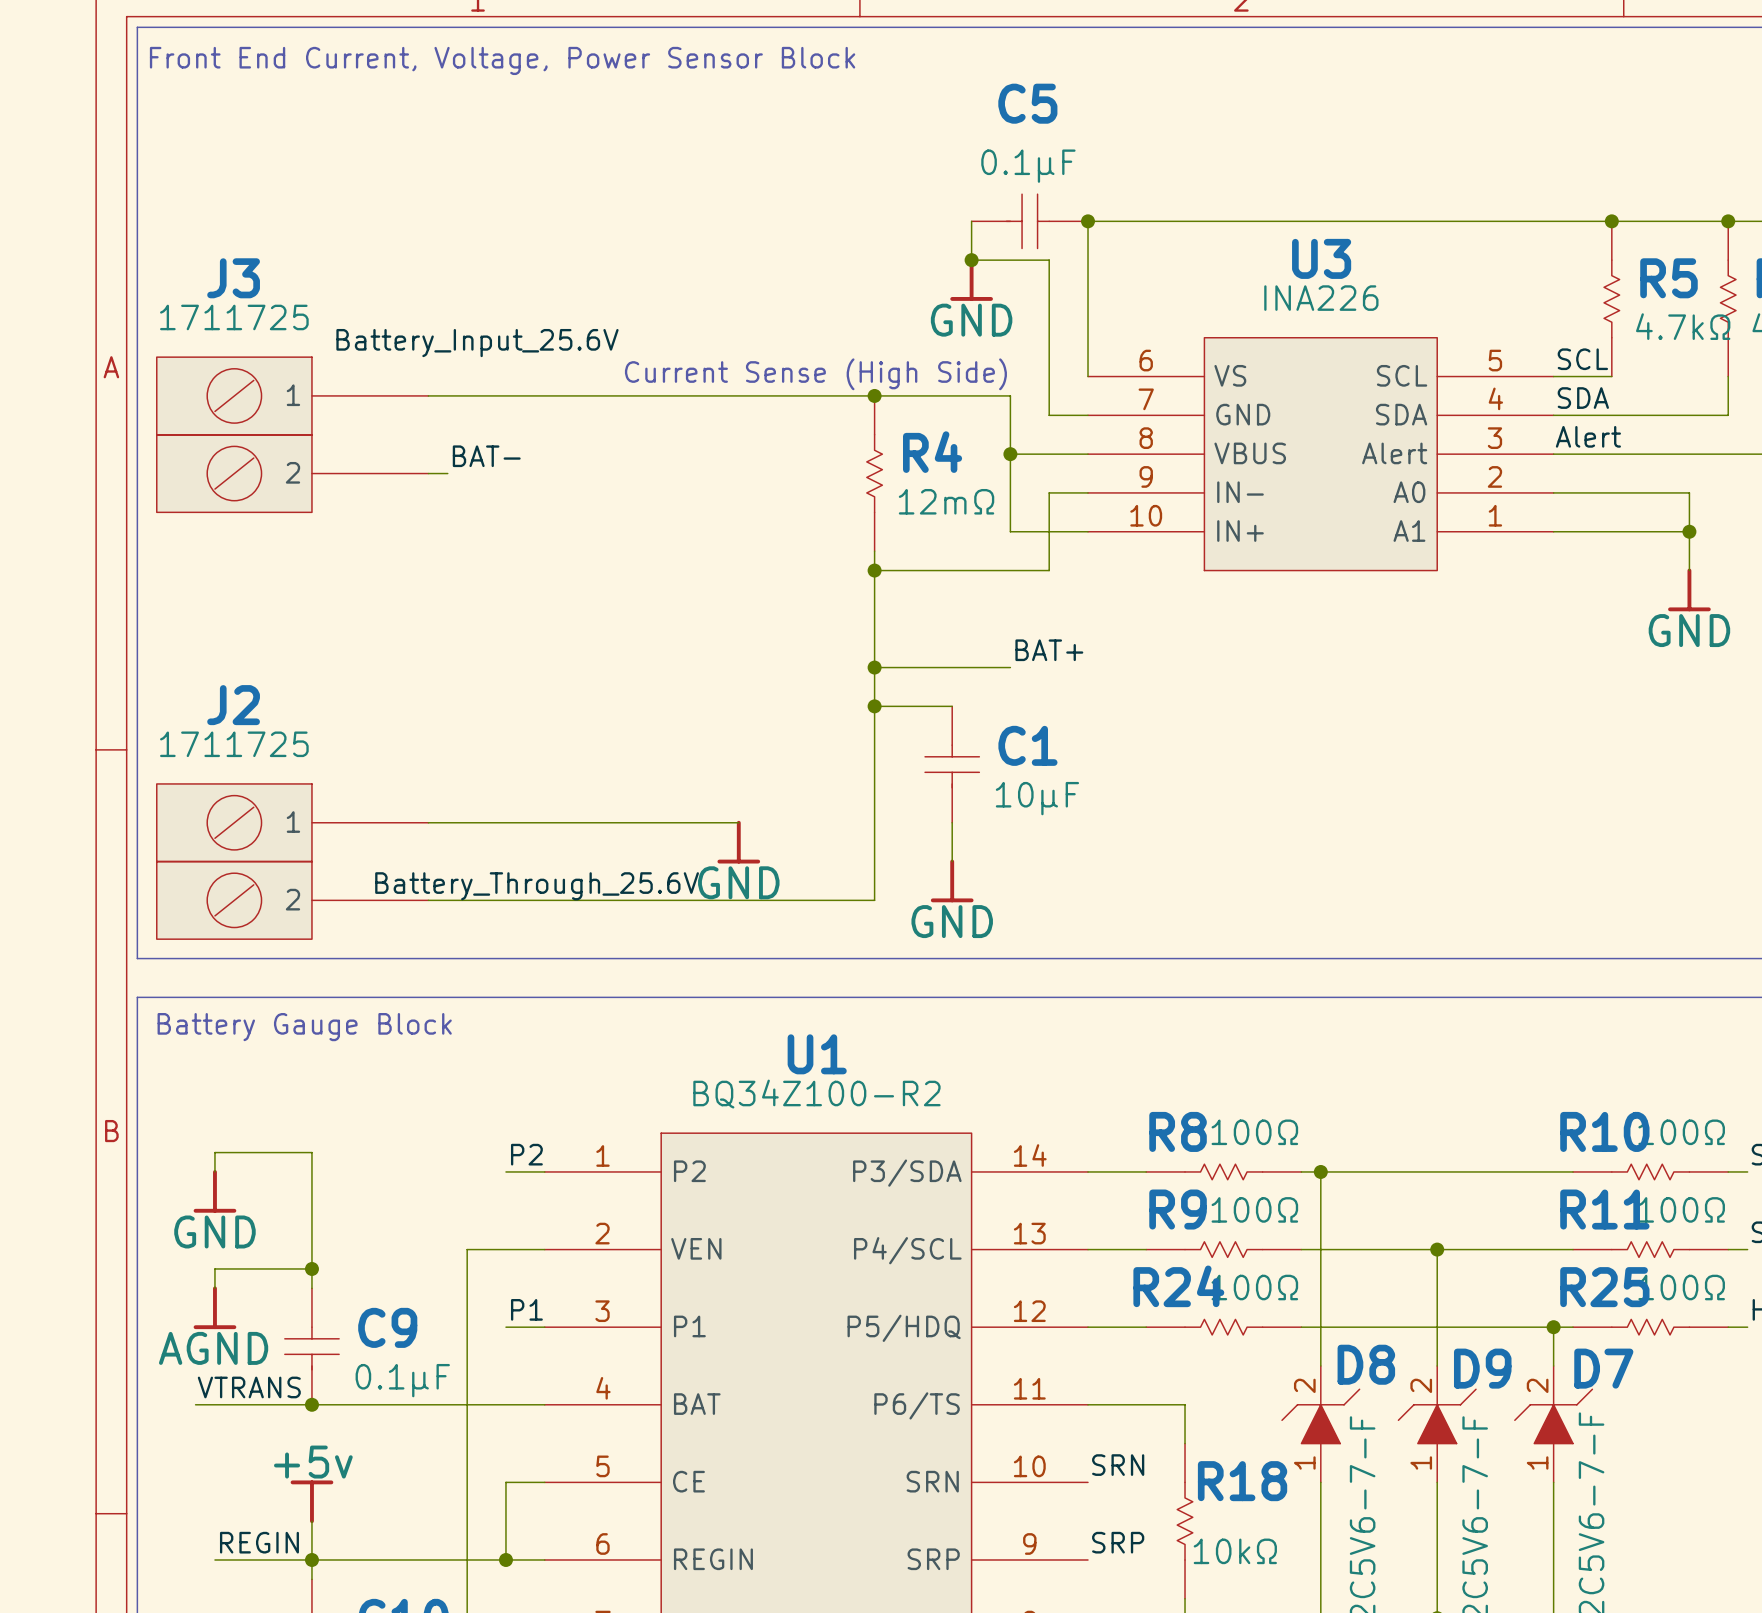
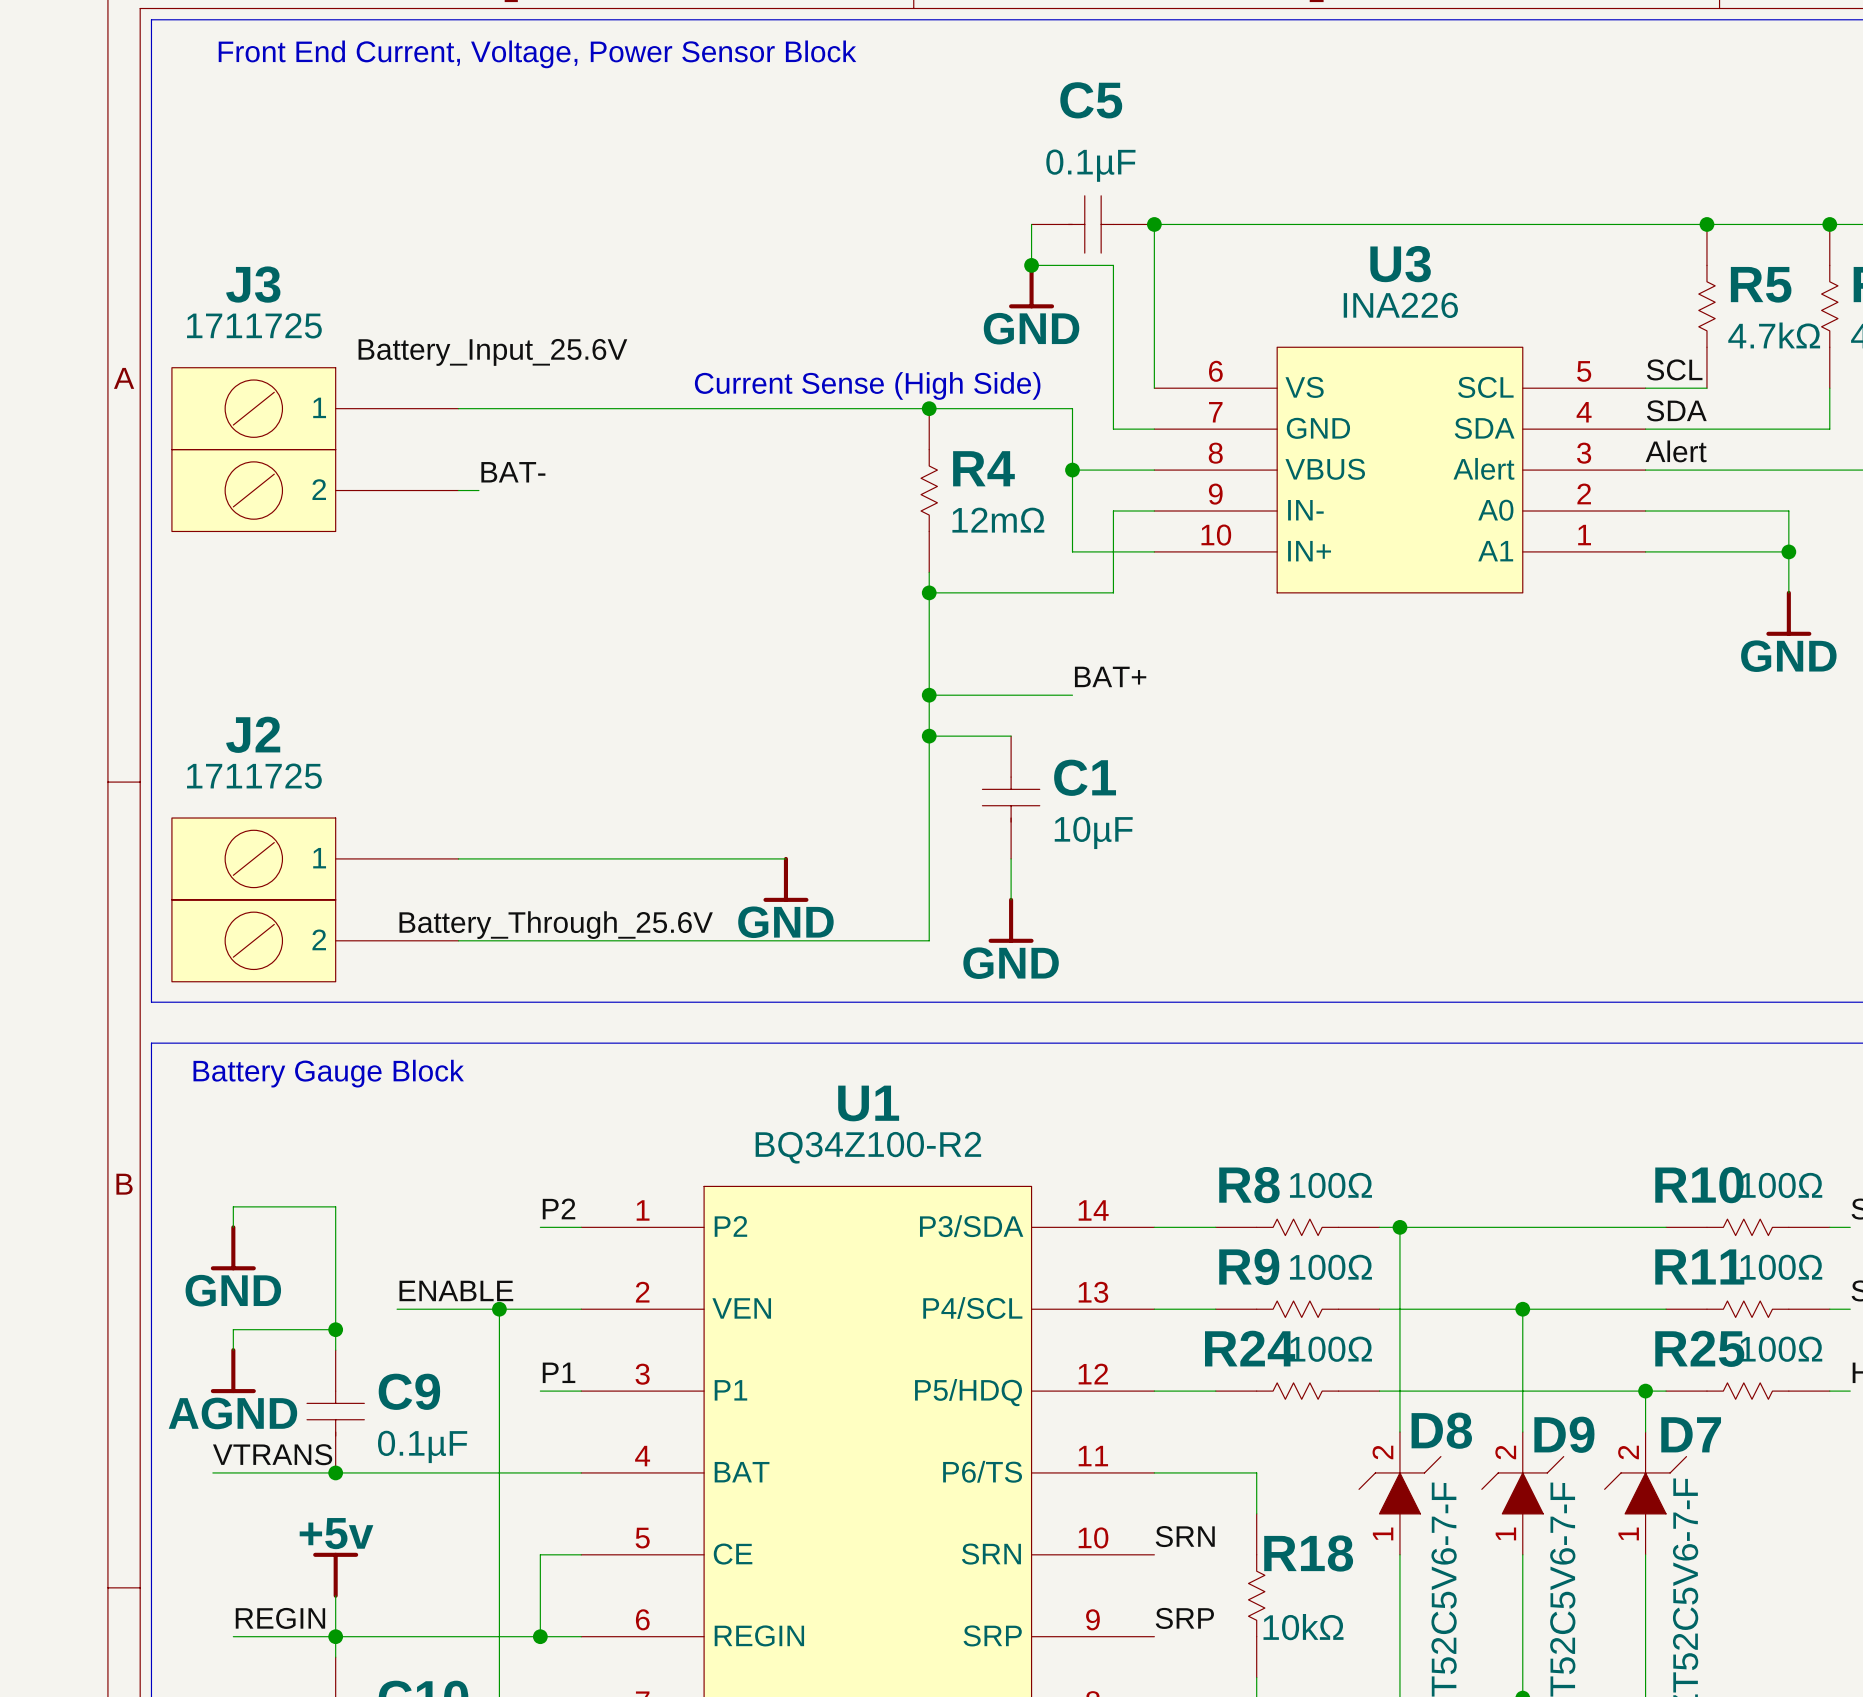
label: none -> ENABLE (456, 1290)
wire: none -> (397, 1309) (499, 1309)
junction: none -> (499, 1309)

